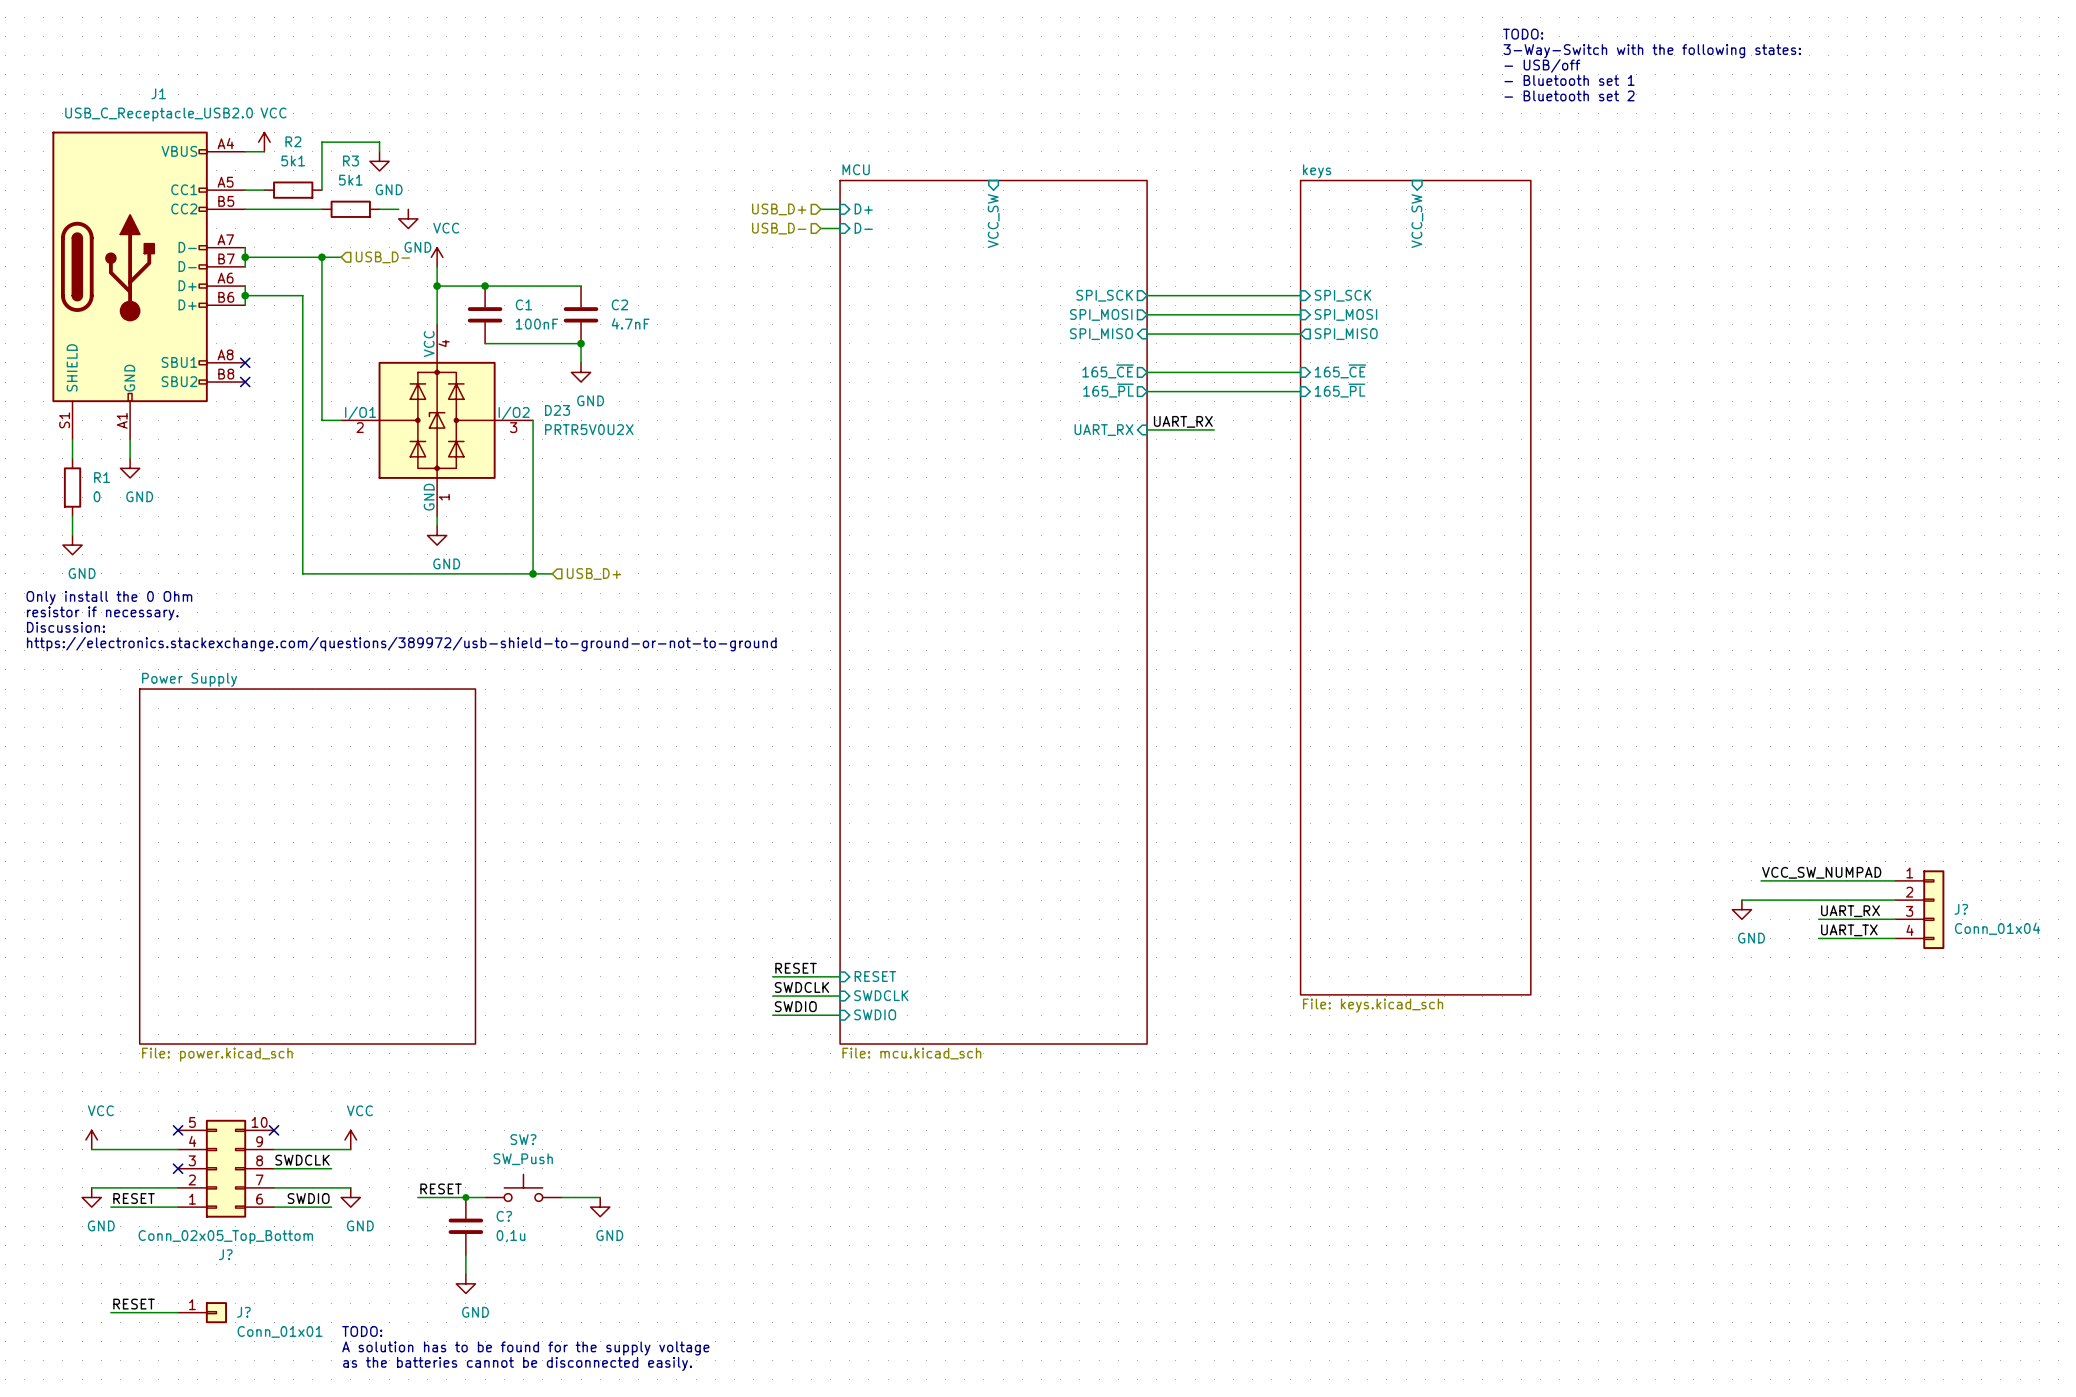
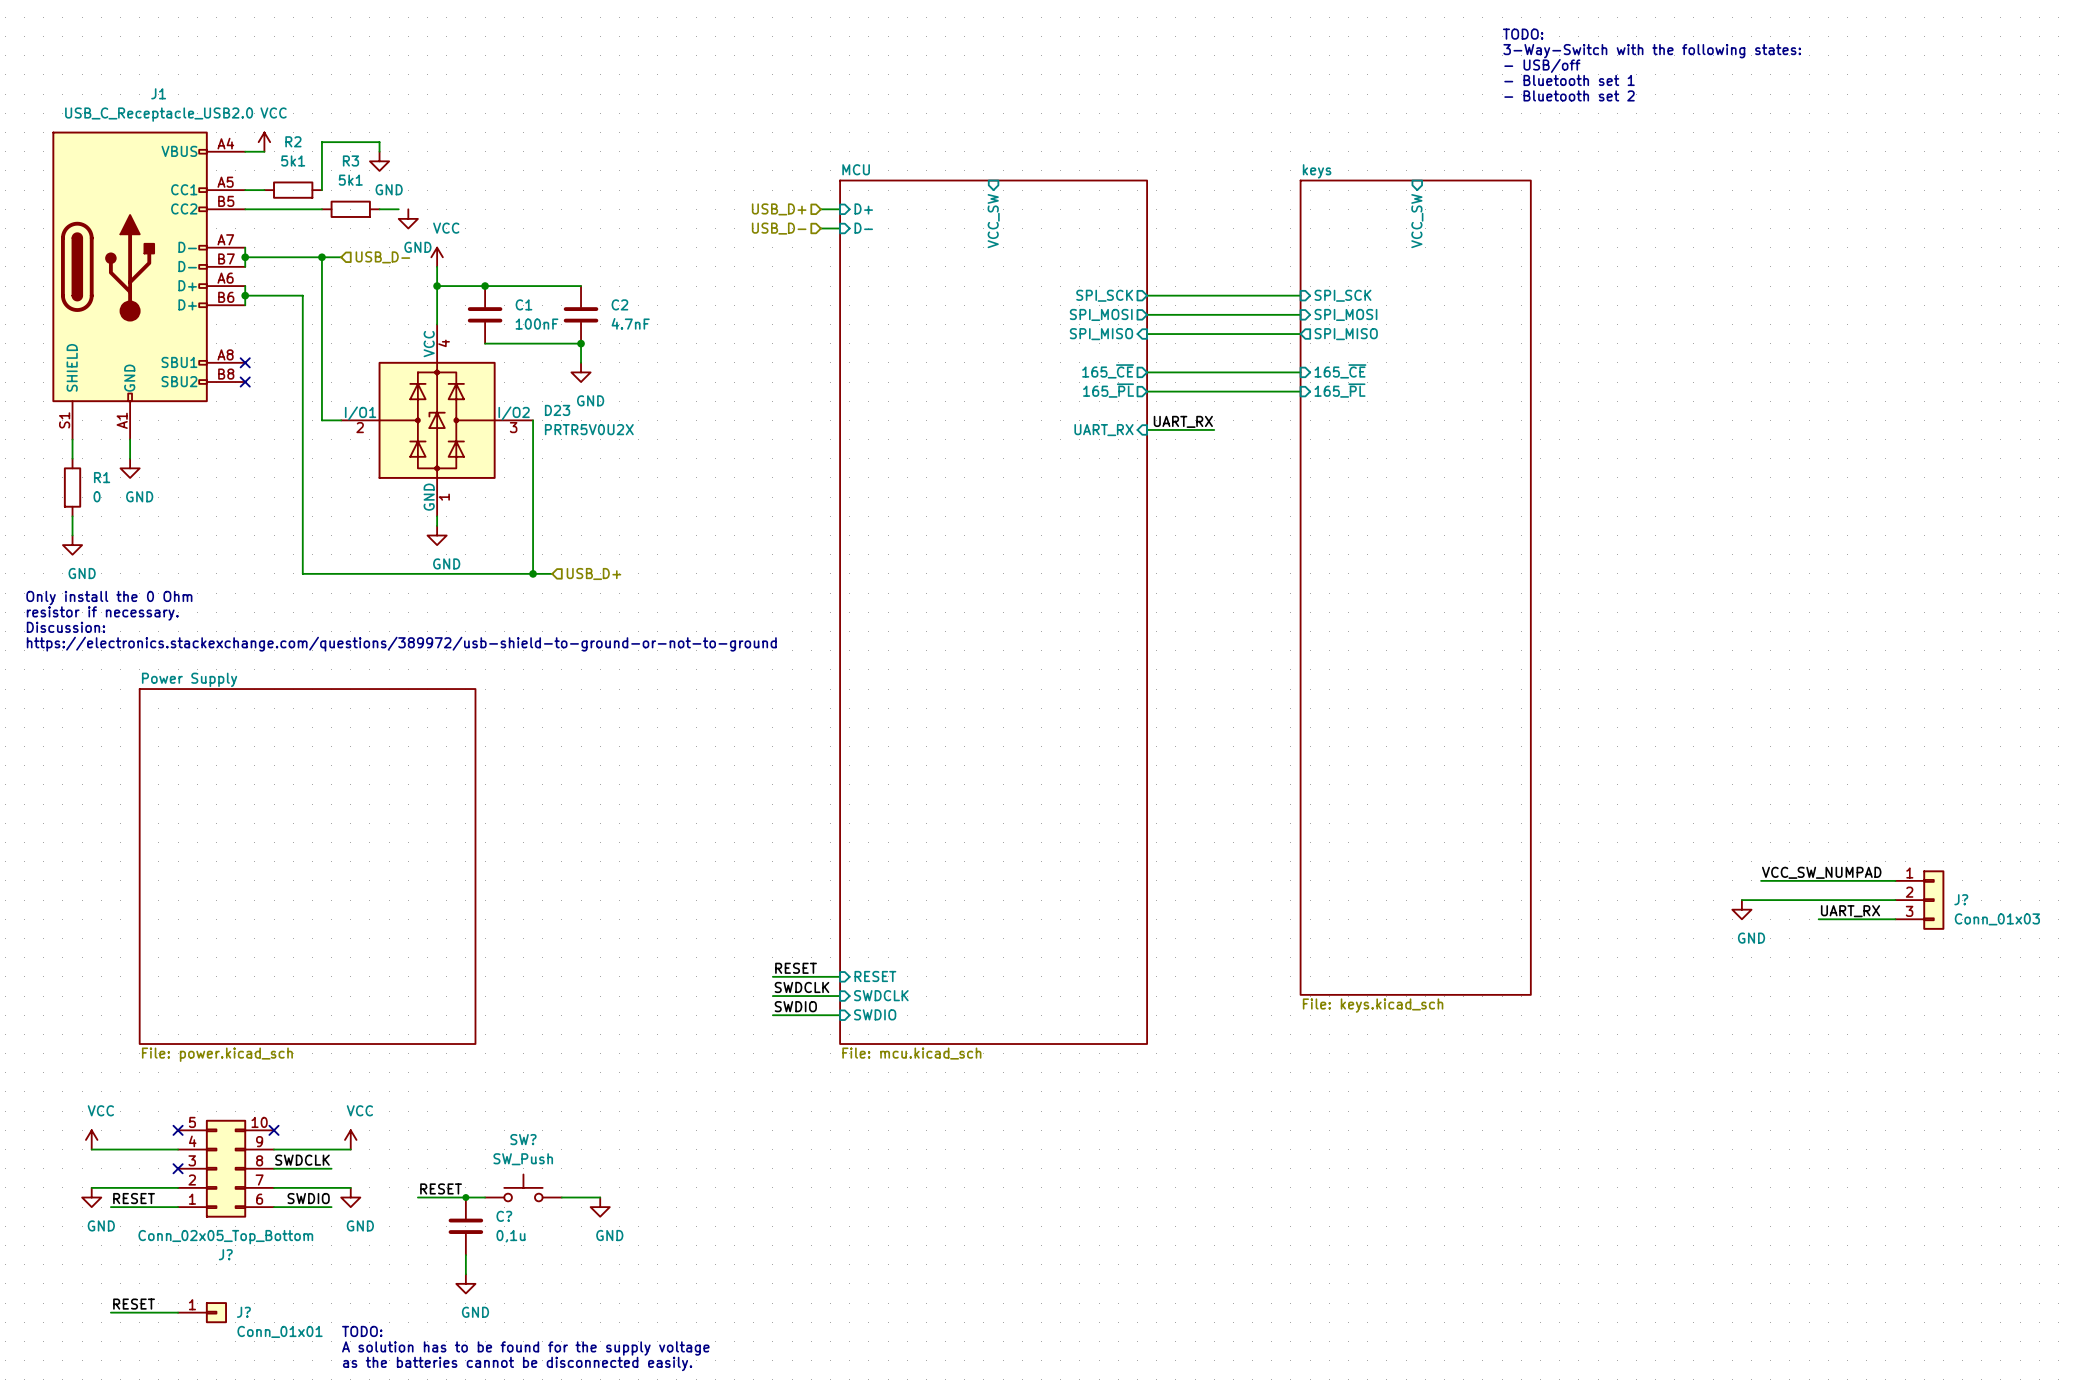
J?: none -> Conn_01x03 (1919, 900)
J?: Conn_01x04 (1919, 909) -> none
label: UART_TX (1849, 930) -> none
wire: (1818, 938) (1895, 938) -> none

